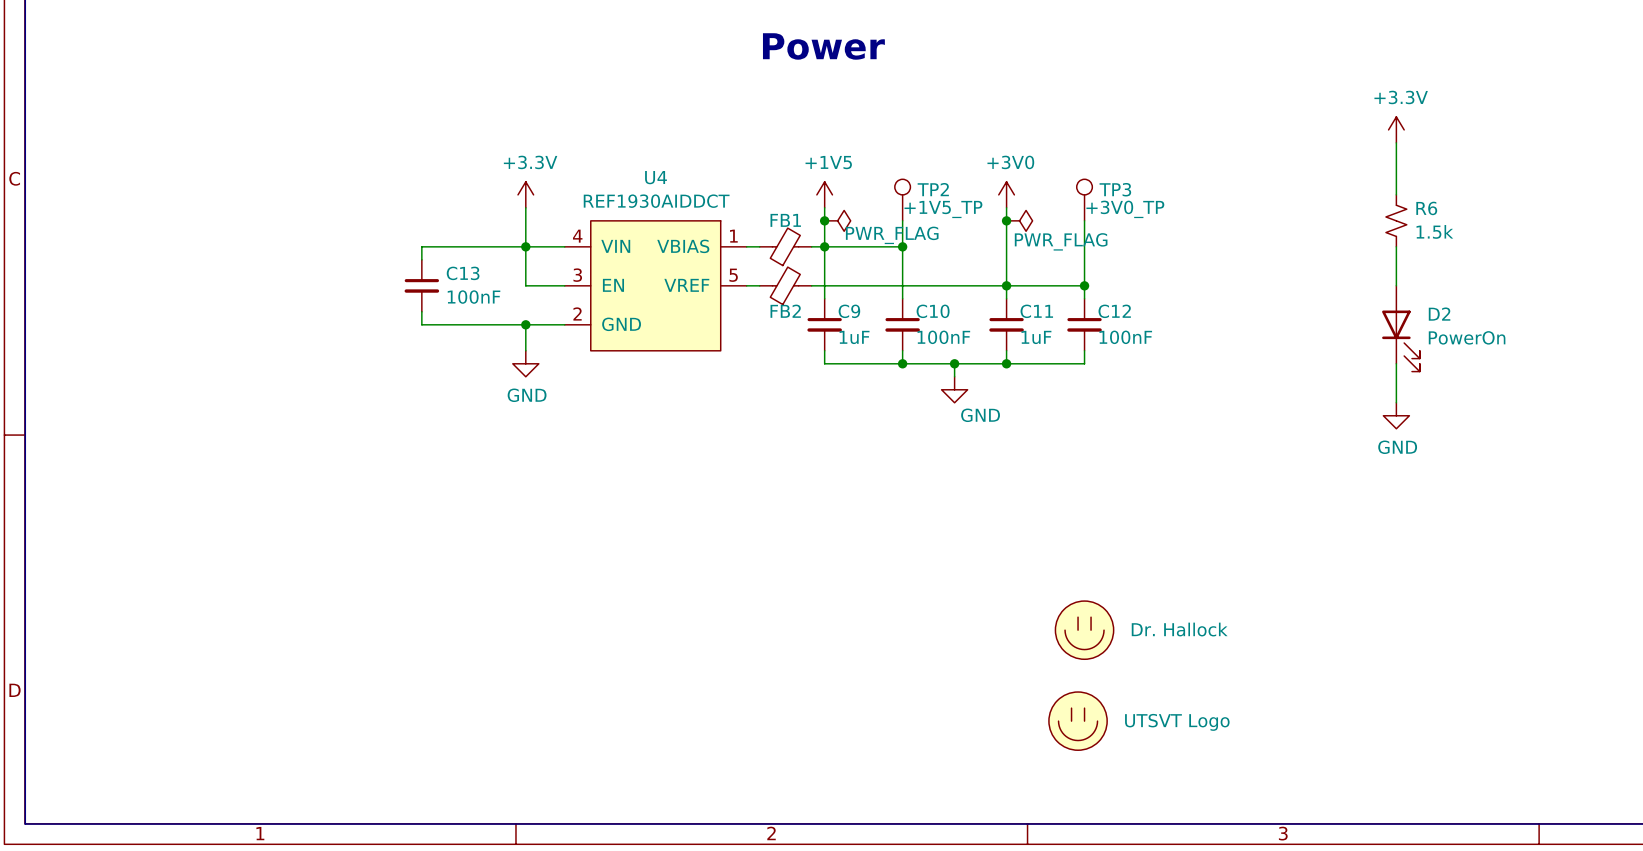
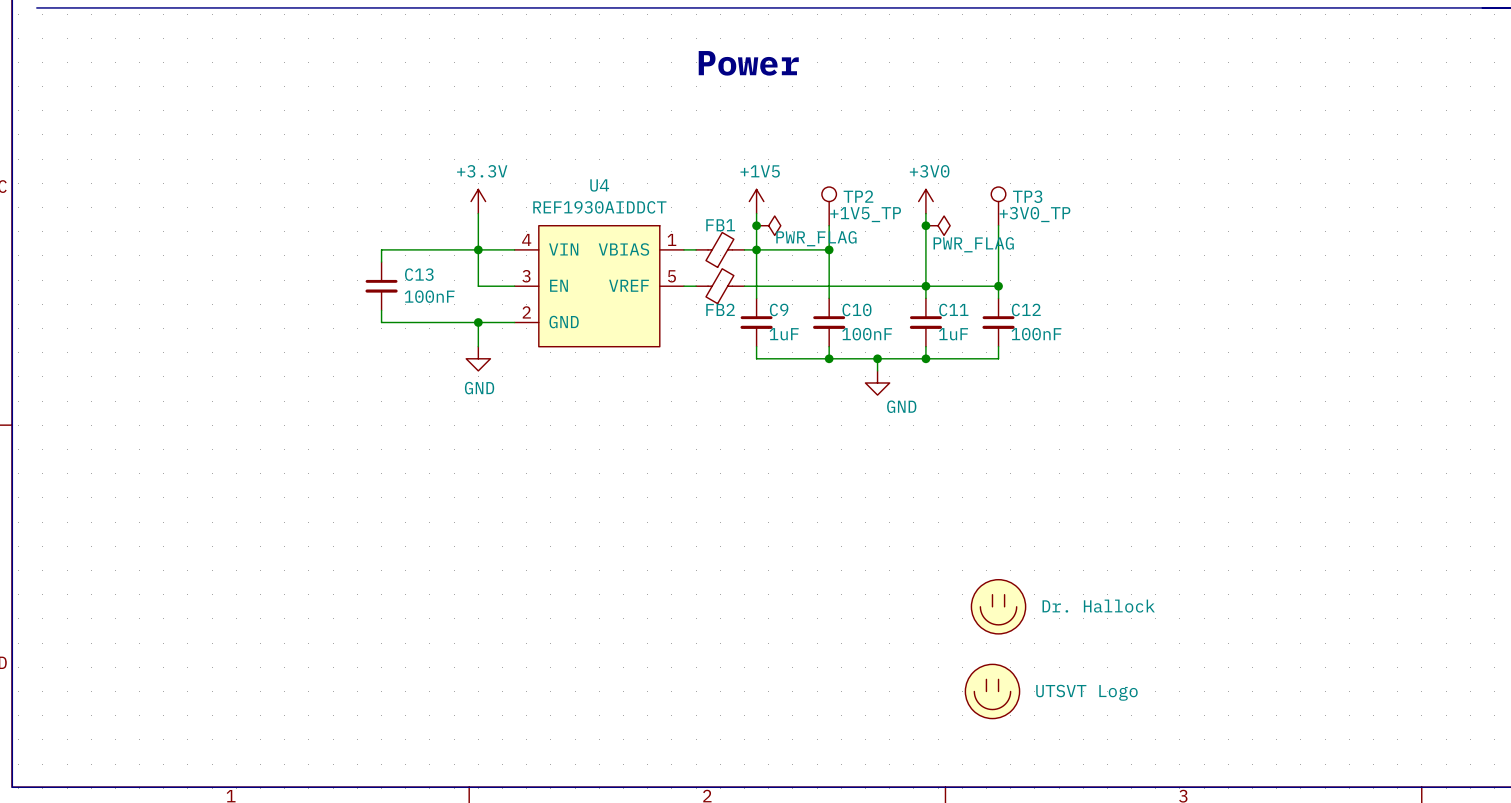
power symbol: +3.3V (1396, 129) -> none
wire: (1396, 142) (1396, 194) -> none
R6: 1.5k (1396, 220) -> none
wire: (1396, 246) (1396, 285) -> none
D2: PowerOn (1400, 328) -> none
wire: (1396, 363) (1396, 402) -> none
power symbol: GND (1396, 415) -> none

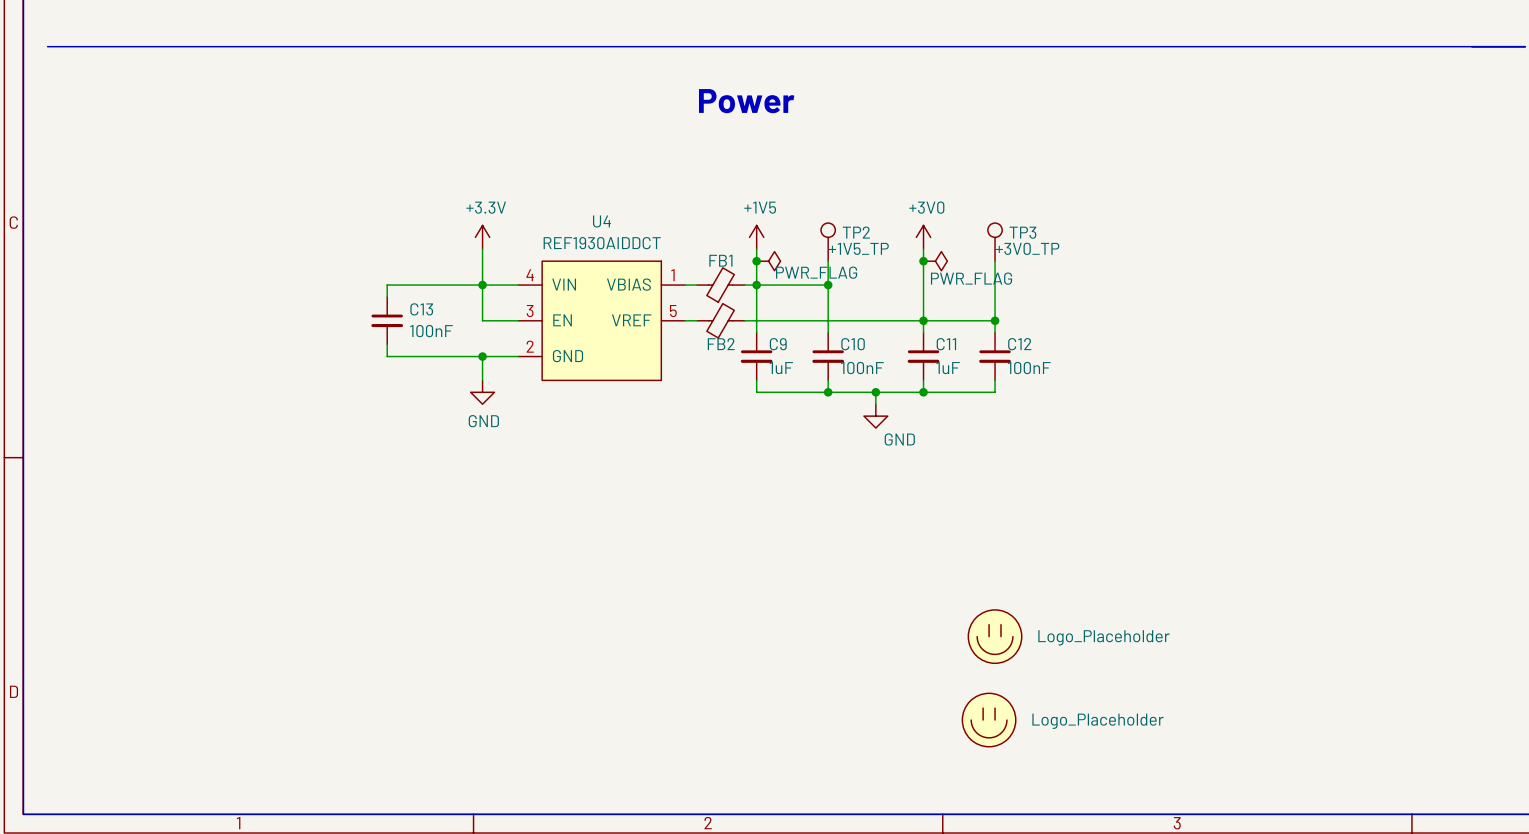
part value: Dr. Hallock (1098, 606) -> Logo_Placeholder (1103, 637)
part value: UTSVT Logo (1086, 692) -> Logo_Placeholder (1098, 721)

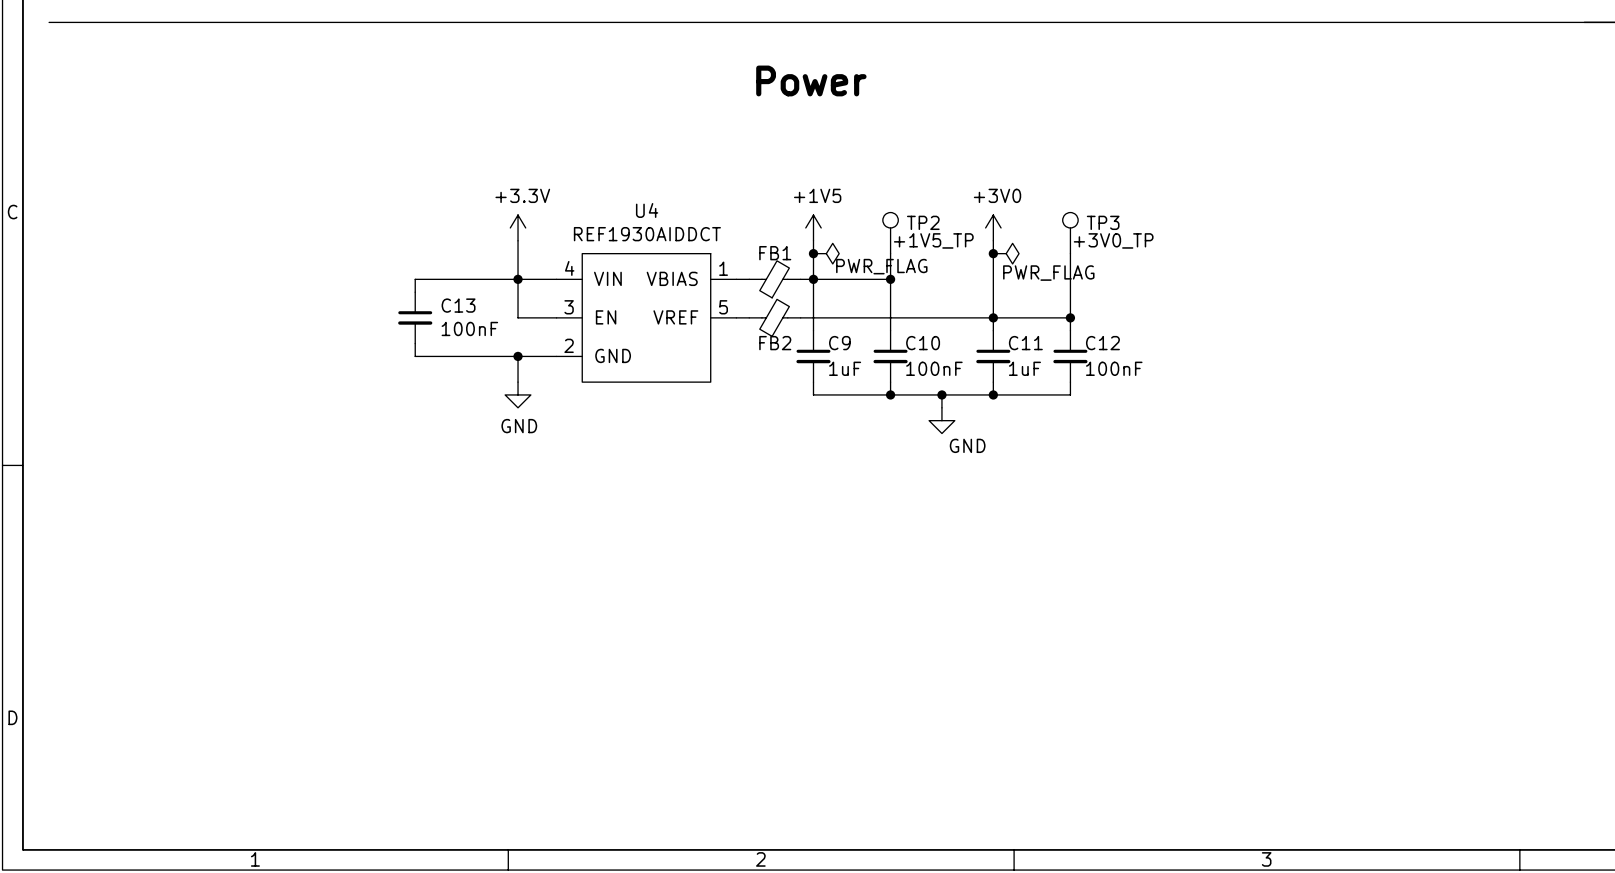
part: Logo_Placeholder (995, 636) -> none
part: Logo_Placeholder (989, 720) -> none

